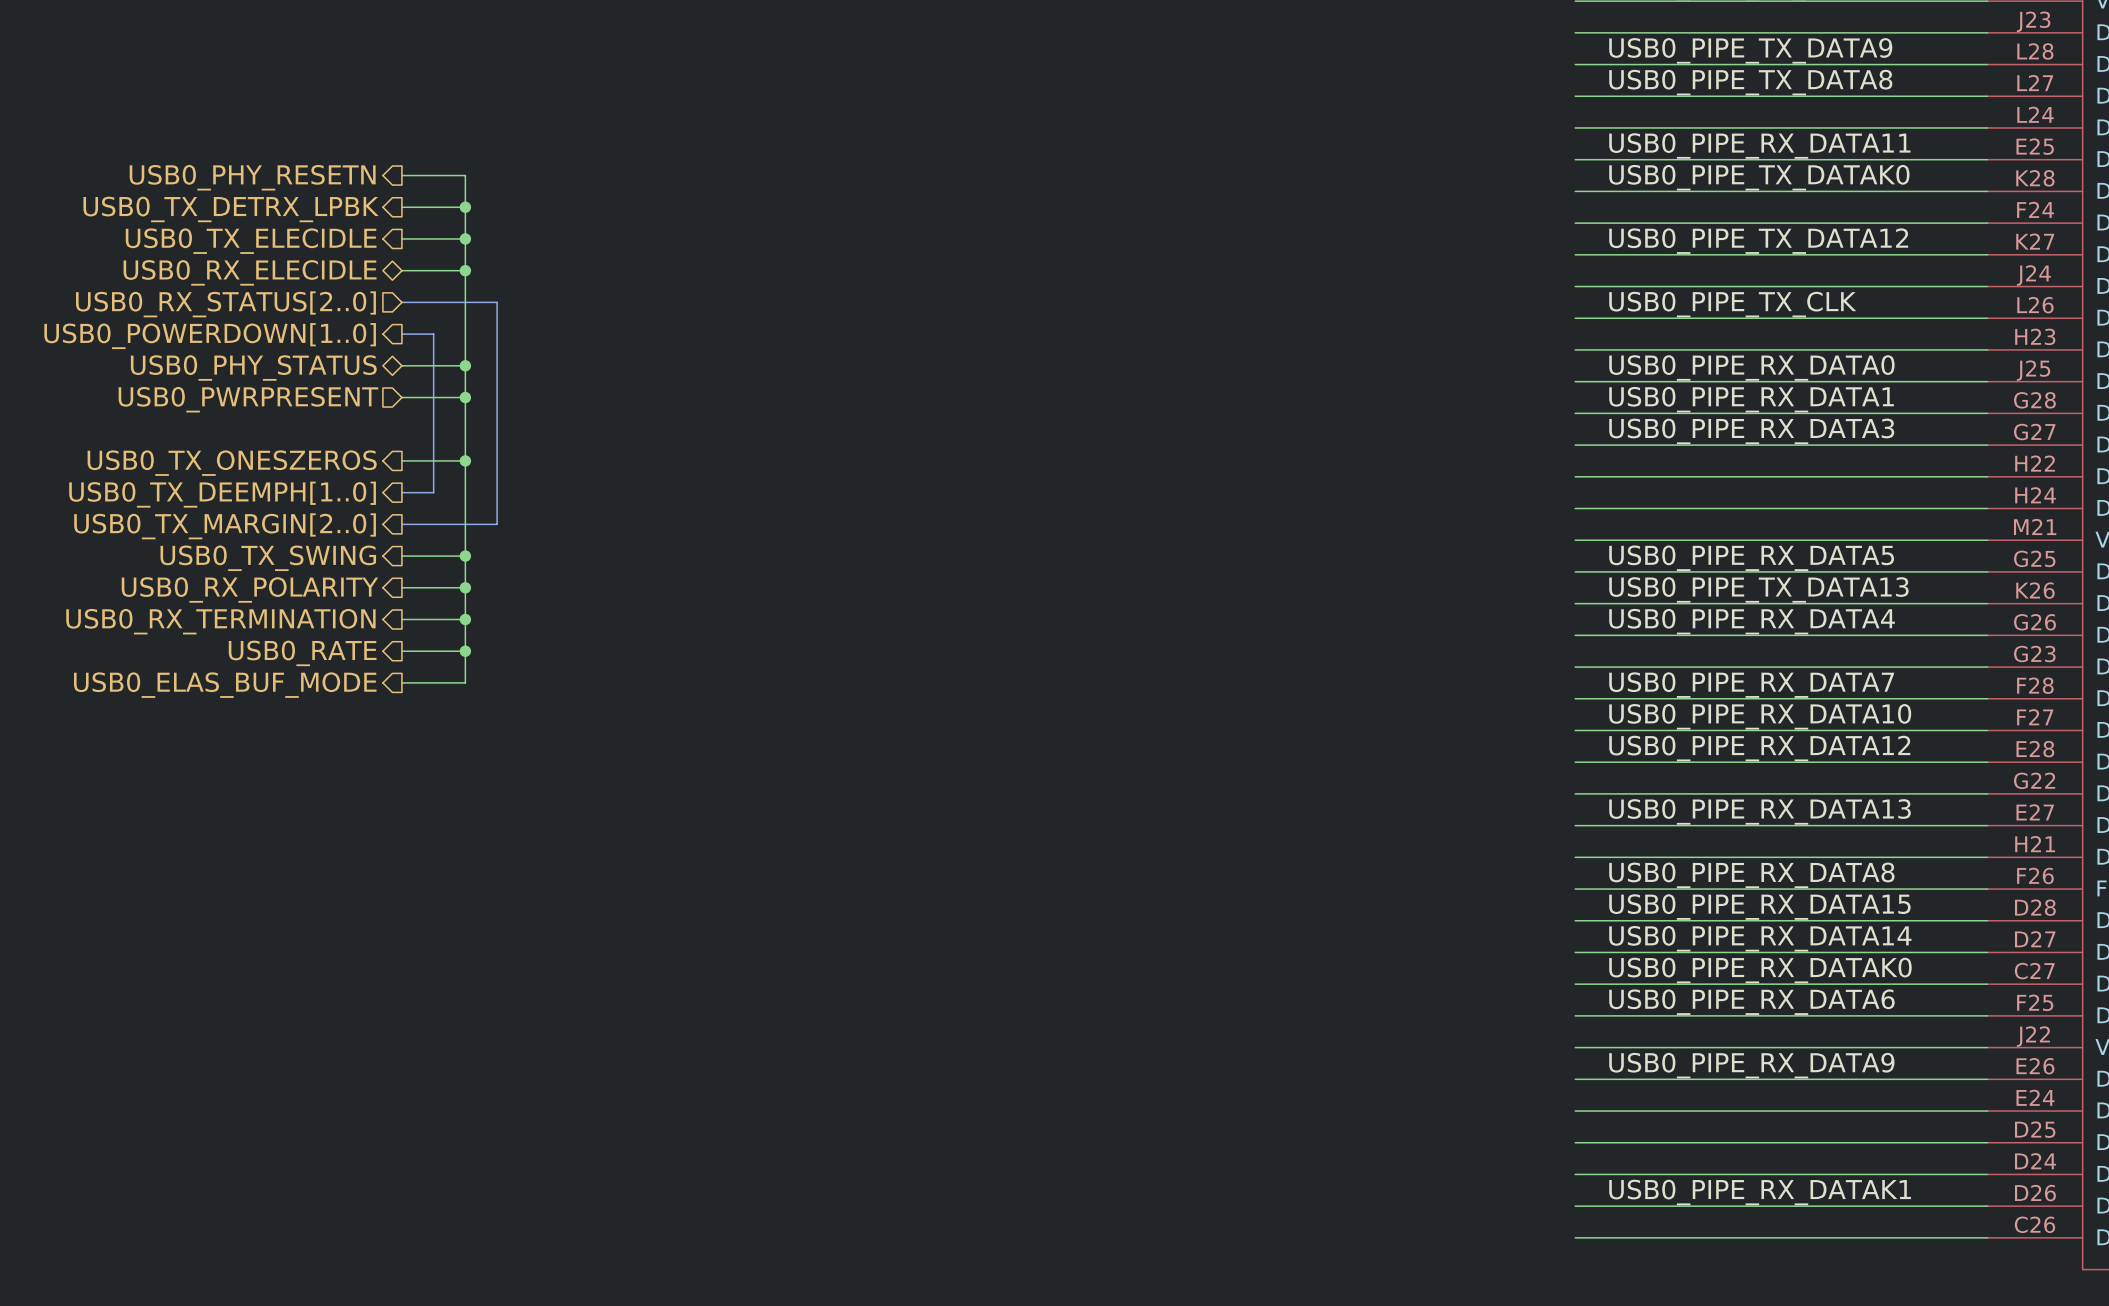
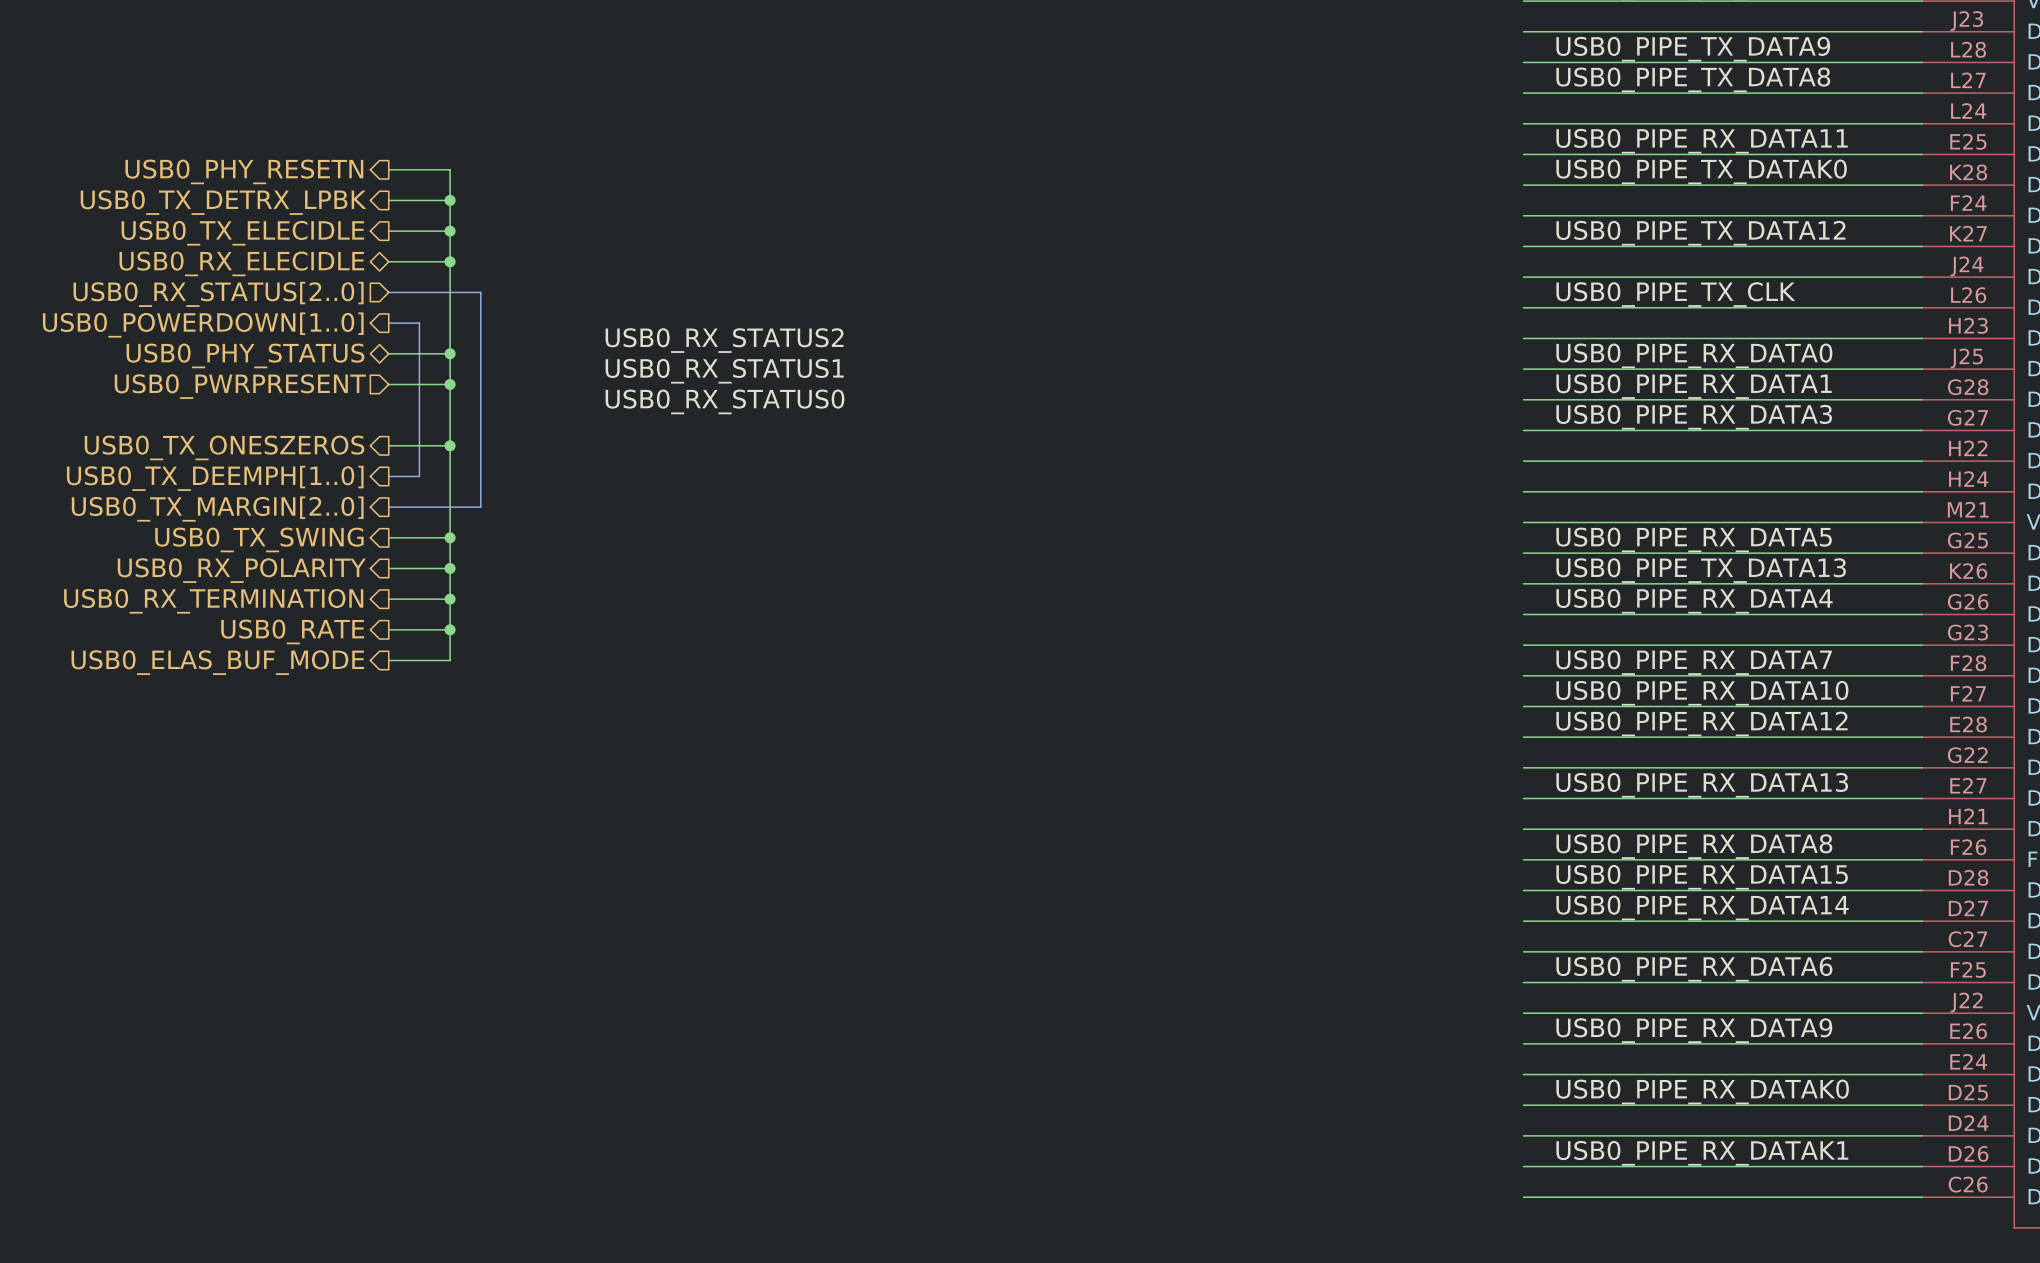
label: none -> USB0_RX_STATUS2 (724, 340)
label: none -> USB0_RX_STATUS1 (724, 371)
label: none -> USB0_RX_STATUS0 (725, 401)
label position: USB0_PIPE_RX_DATAK0 (1760, 970) -> USB0_PIPE_RX_DATAK0 (1702, 1091)

